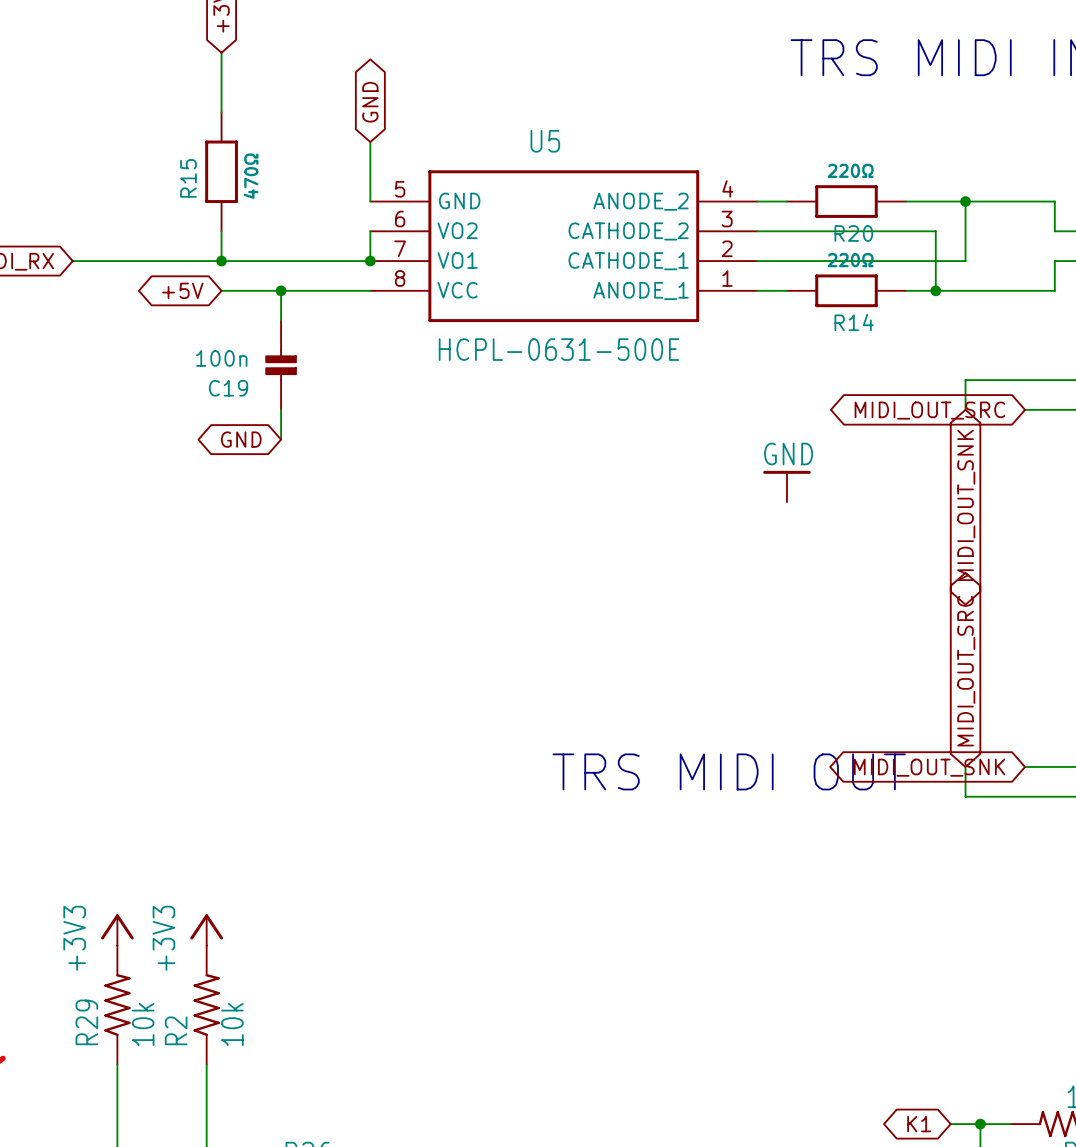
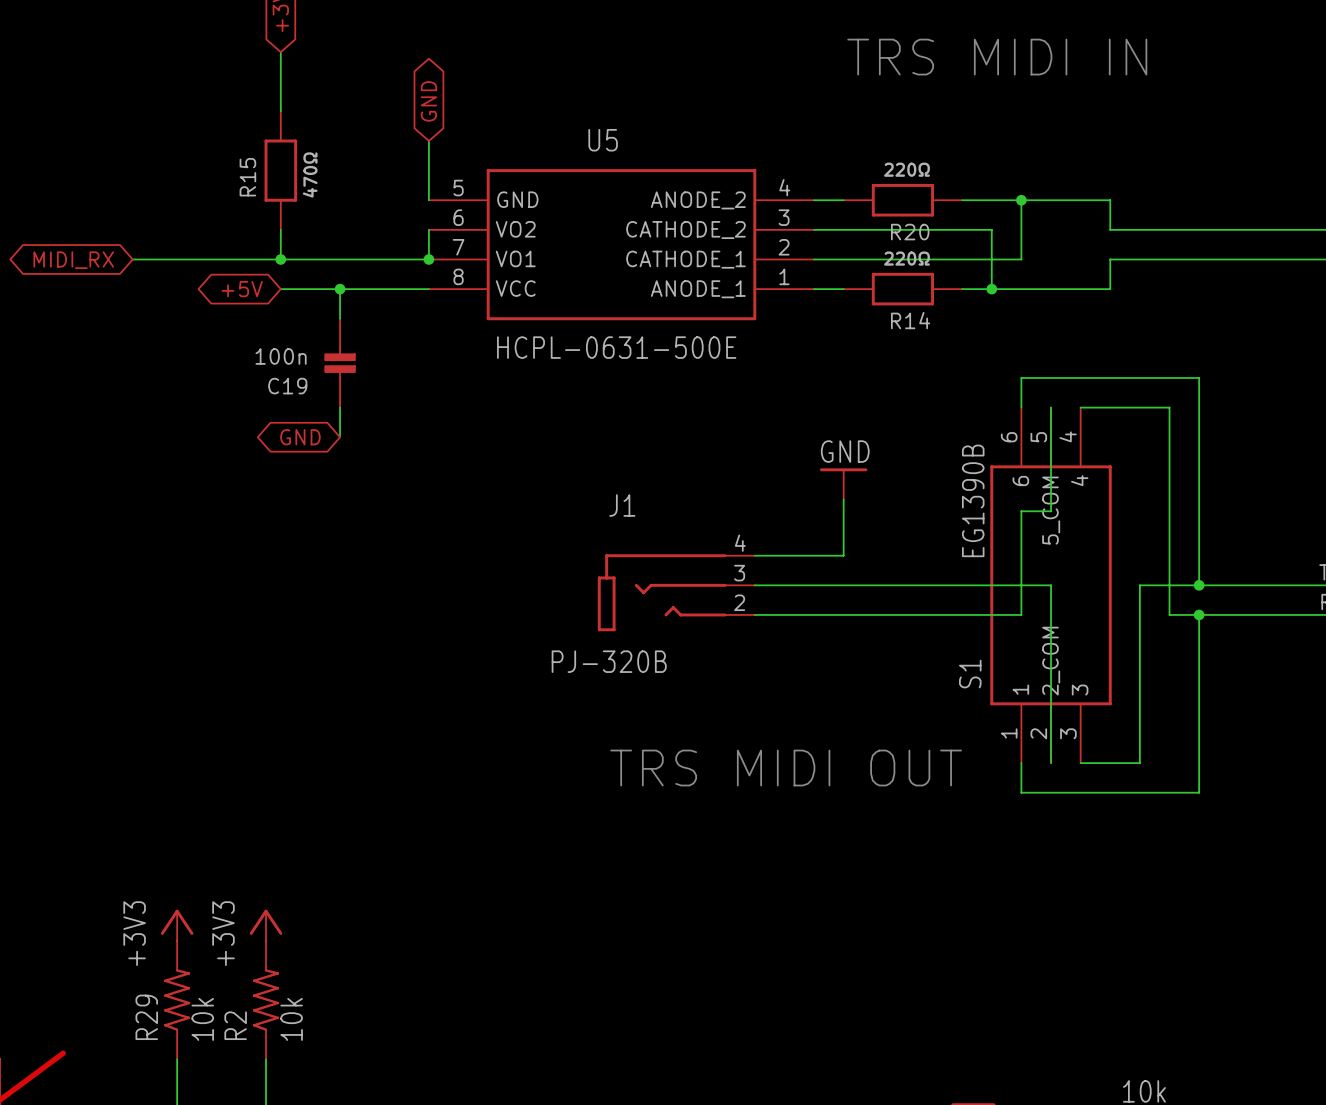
wire: none -> (1051, 407) (1051, 511) (1021, 511) (1021, 614) (754, 614)
global label: MIDI_OUT_SRC (929, 410) -> none
wire: none -> (843, 499) (843, 555) (754, 555)
global label: MIDI_OUT_SNK (966, 505) -> none
wire: none -> (754, 585) (1051, 585) (1051, 763)
S1: none -> EG1390B (1051, 585)
J1: none -> PJ-320B (676, 592)
global label: MIDI_OUT_SRC (966, 671) -> none
global label: MIDI_OUT_SNK (929, 767) -> none

